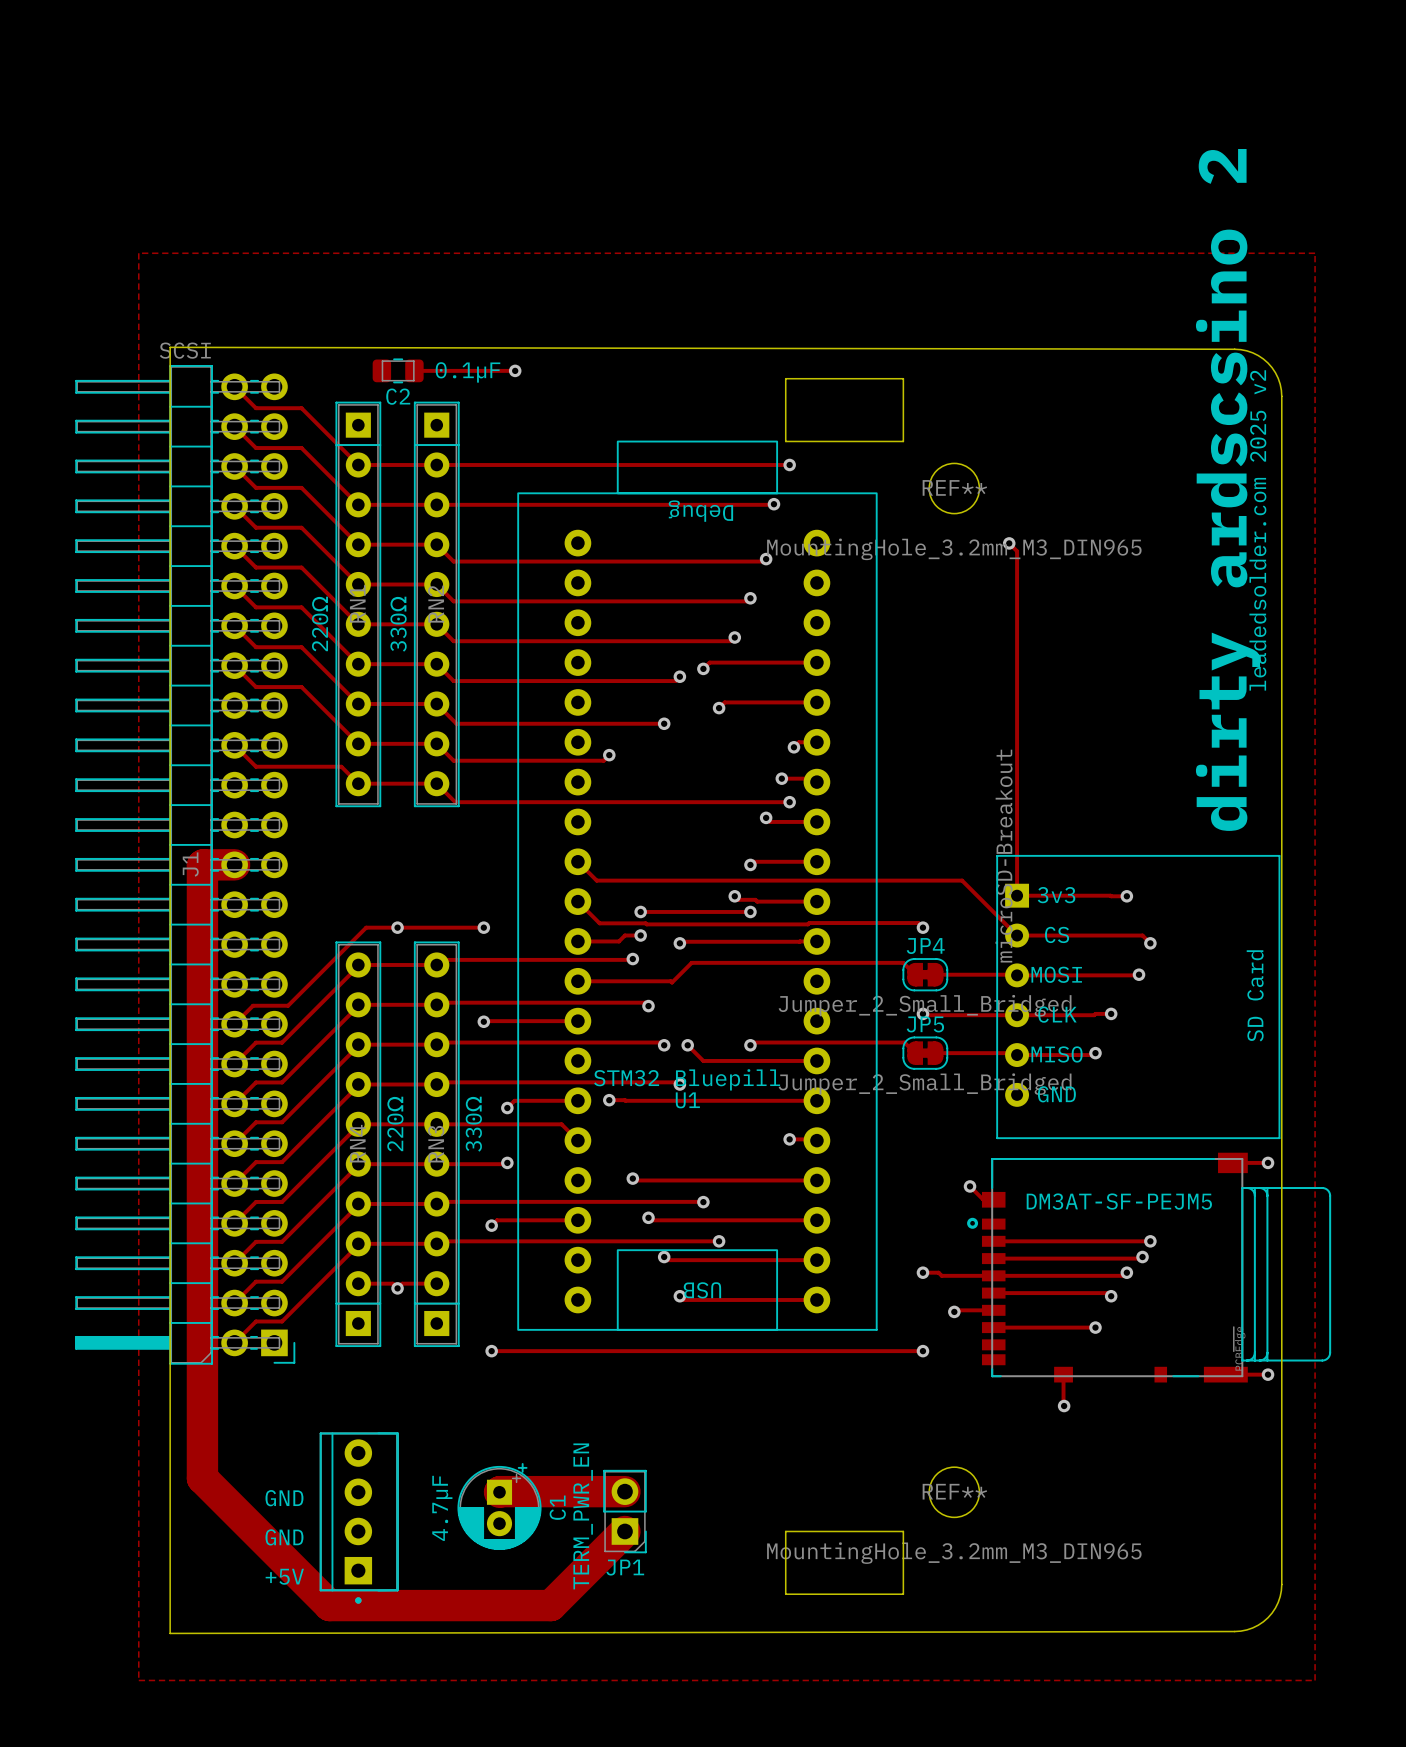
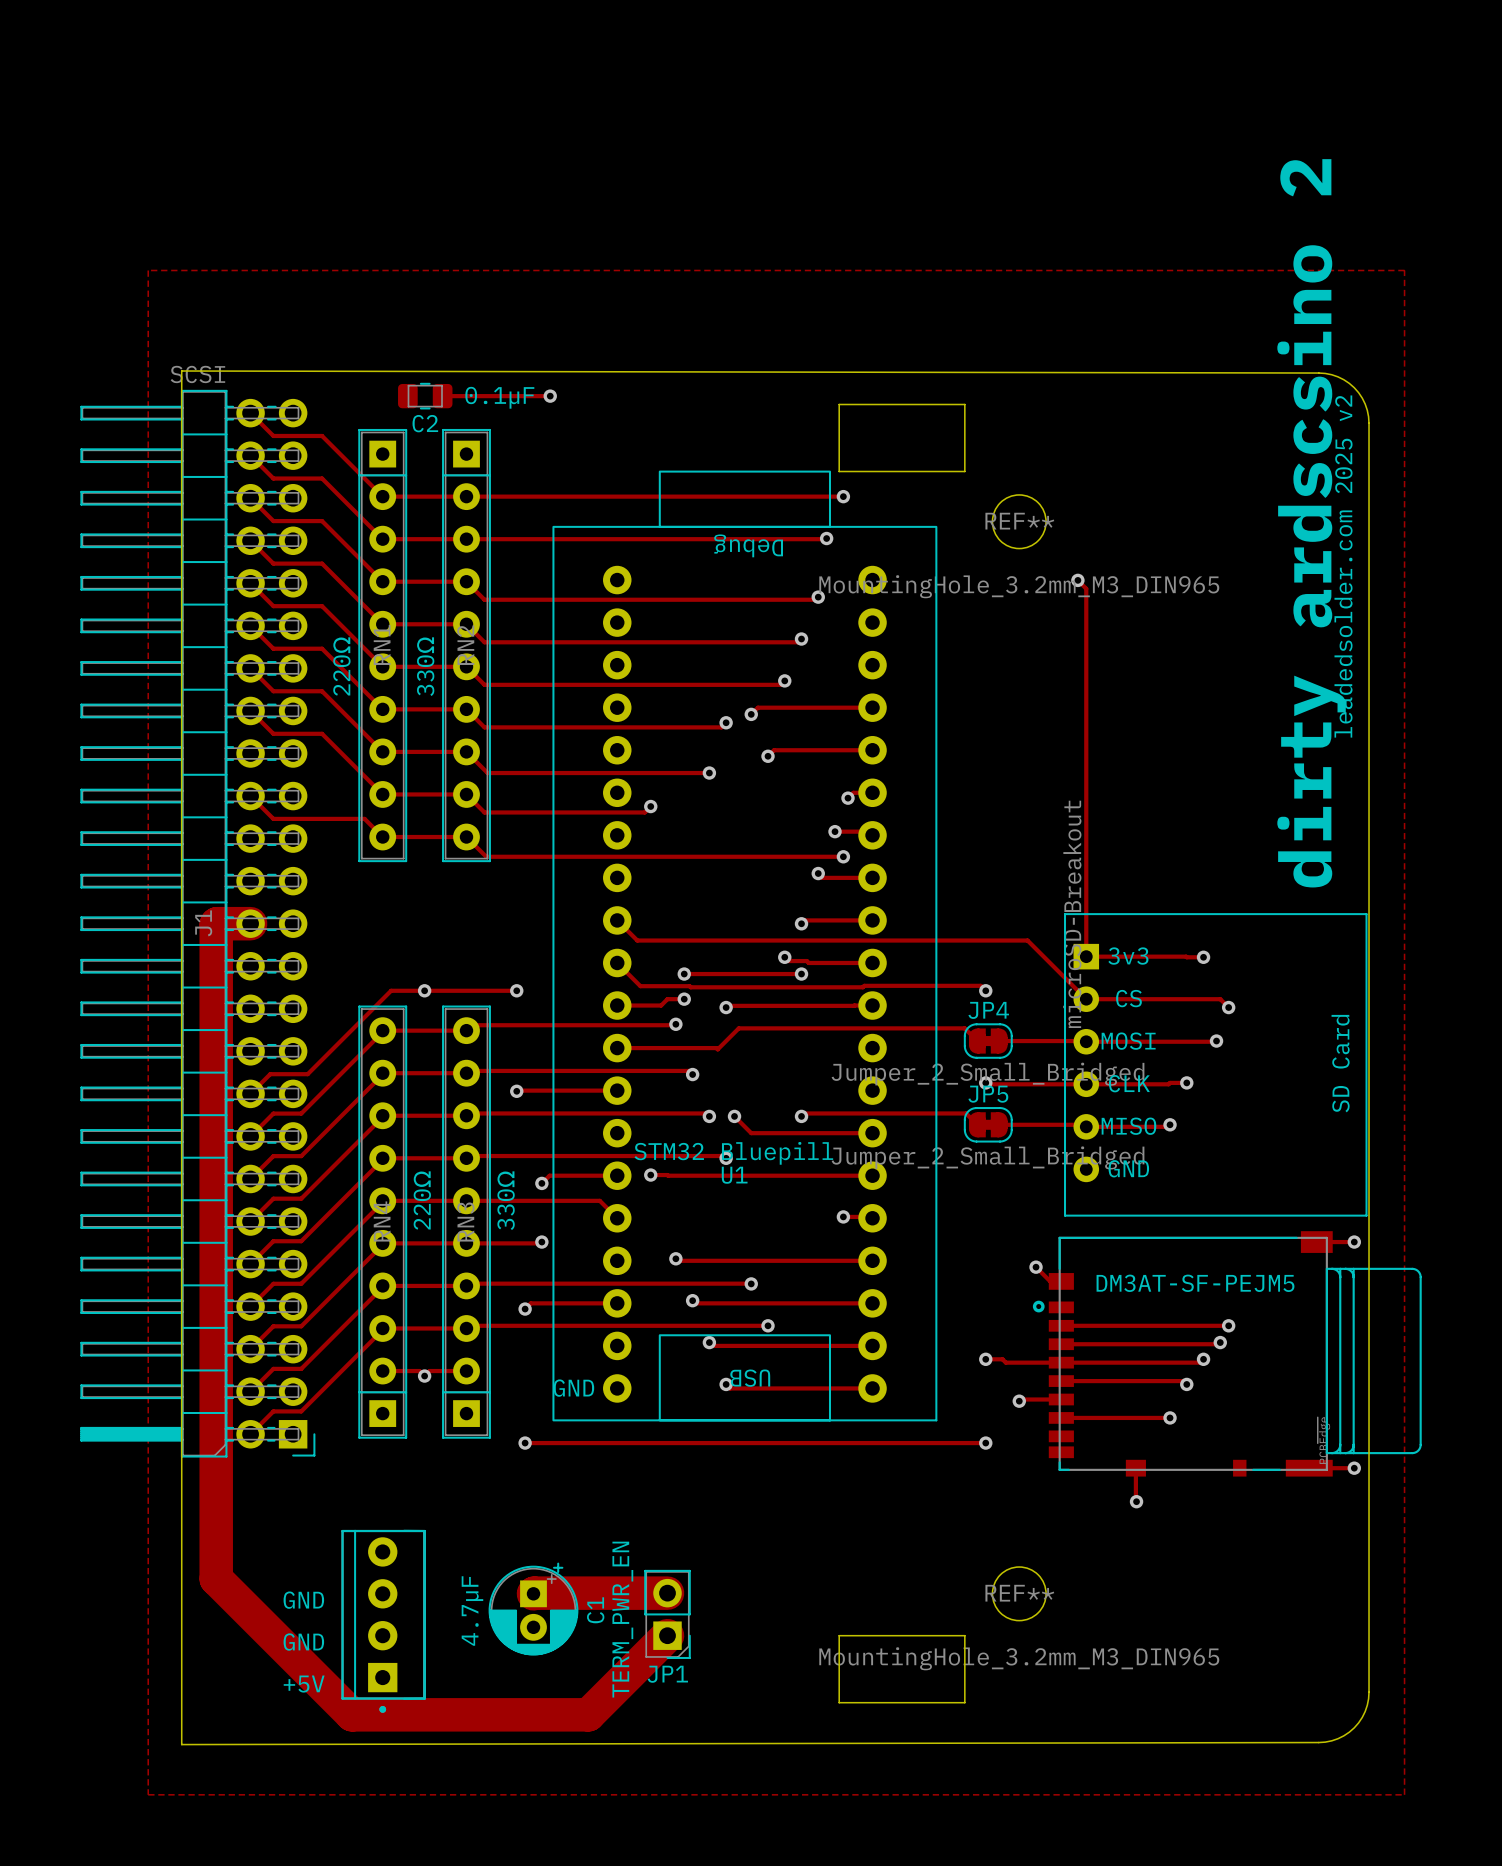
text: none -> GND (573, 1388)

